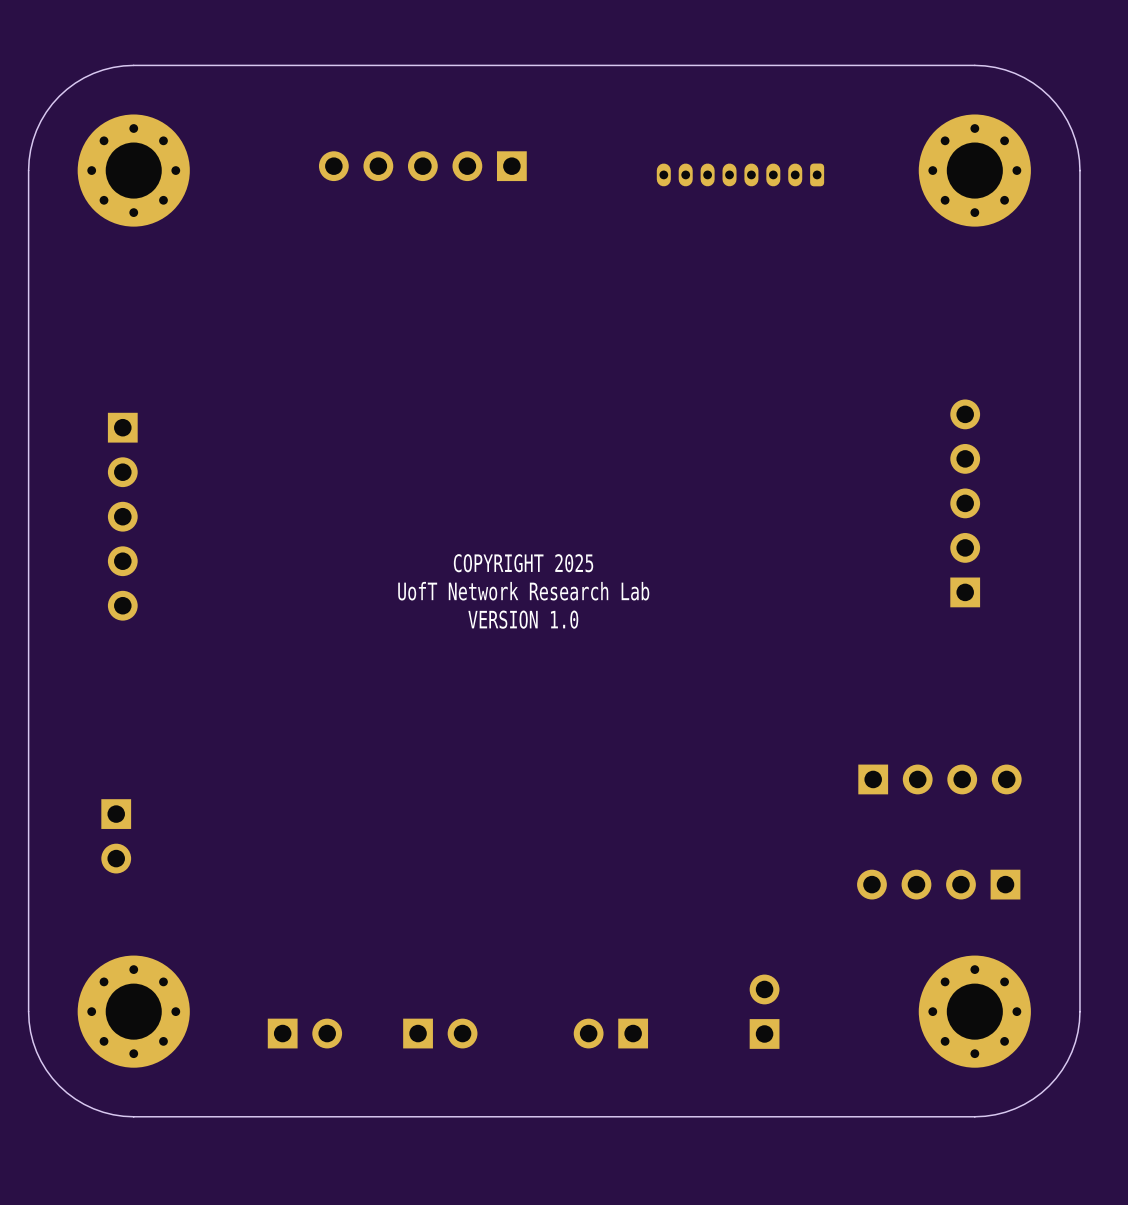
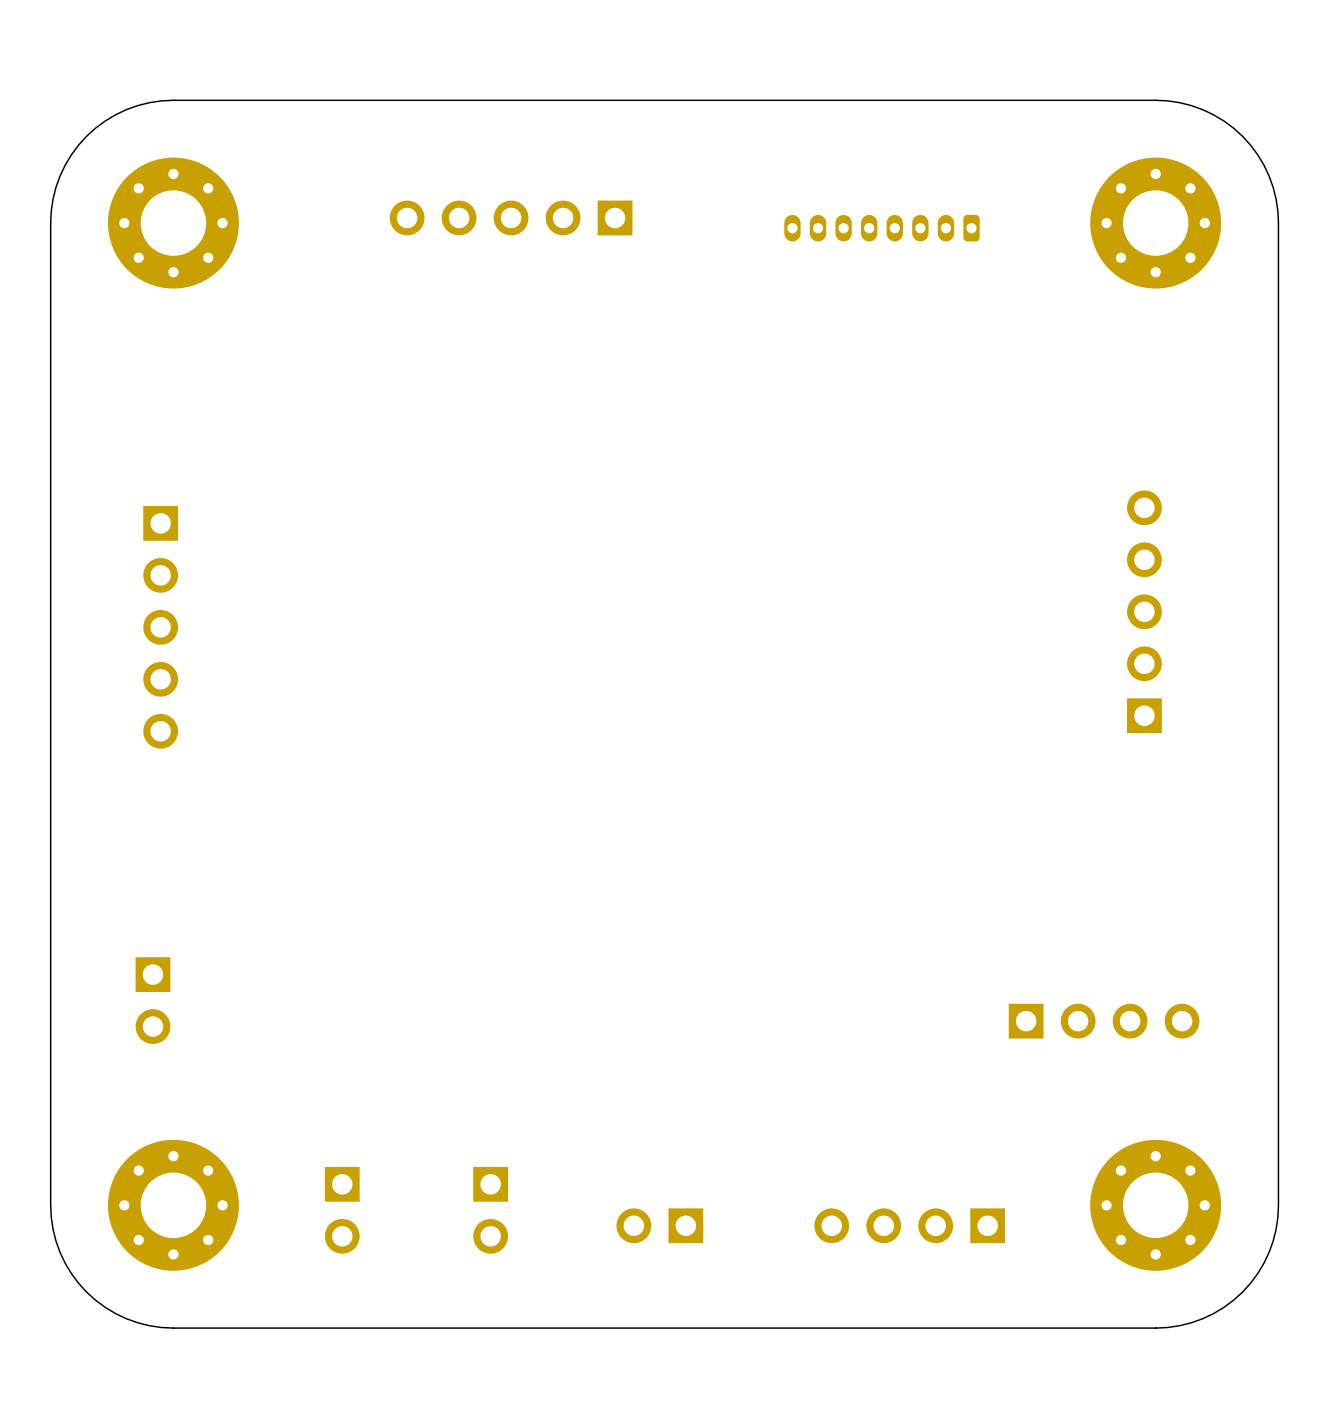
text: COPYRIGHT 2025 (523, 563) -> none
text: UofT Network Research Lab (523, 591) -> none
text: VERSION 1.0 (523, 619) -> none
part: (939, 779) -> none
part rotation: 0° (938, 884) -> 180° (1104, 1021)
part footprint: [749, 974, 780, 1049] -> [814, 1208, 1006, 1244]
part: none -> (659, 1225)
part rotation: 0° (304, 1033) -> 90° clockwise (342, 1210)
part rotation: 0° (440, 1033) -> 90° clockwise (490, 1210)
part: (610, 1033) -> none

